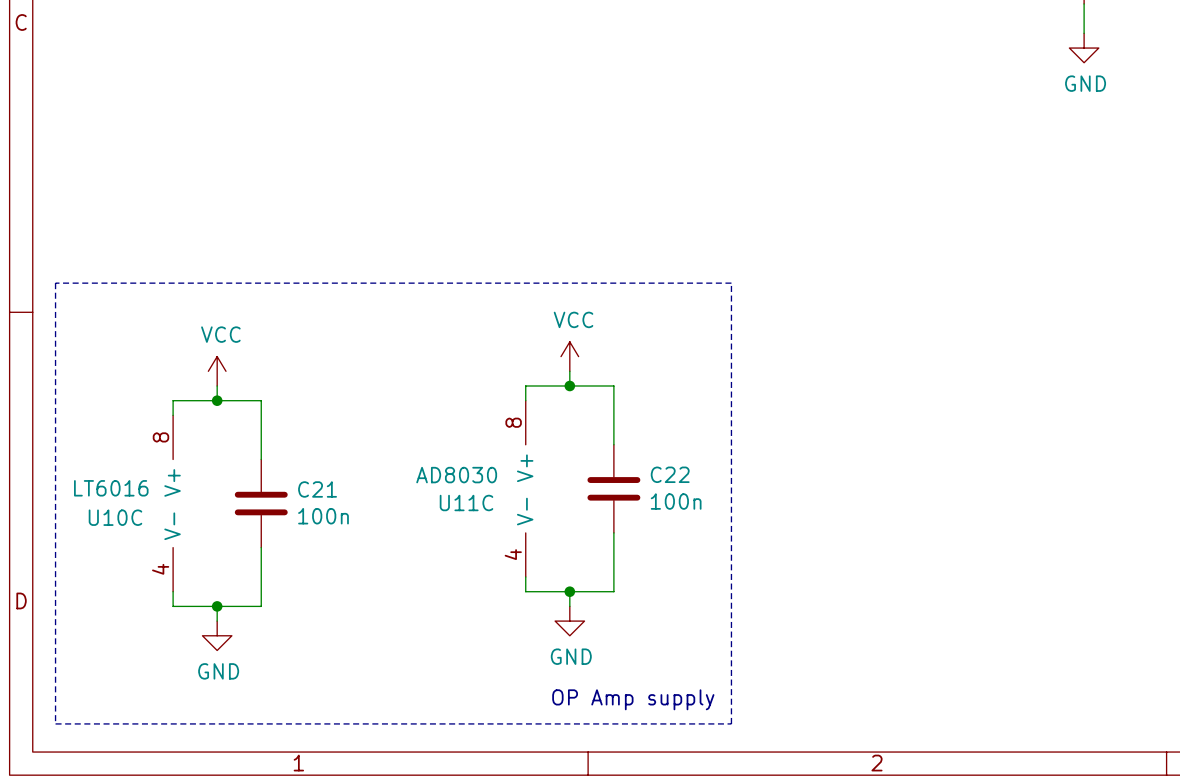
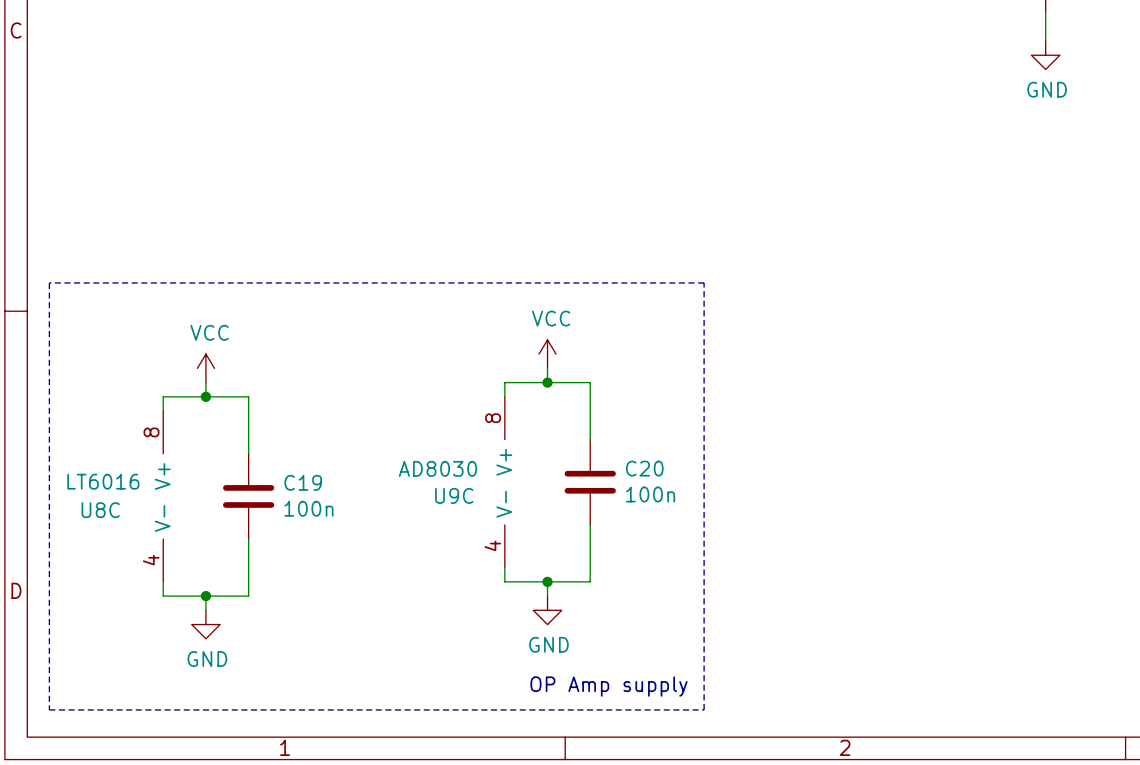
C22 name: C22 (670, 474) -> C20 (644, 468)
C21 name: C21 (317, 489) -> C19 (303, 482)
U11C name: U11C (466, 502) -> U9C (454, 495)
U10C name: U10C (115, 517) -> U8C (100, 510)

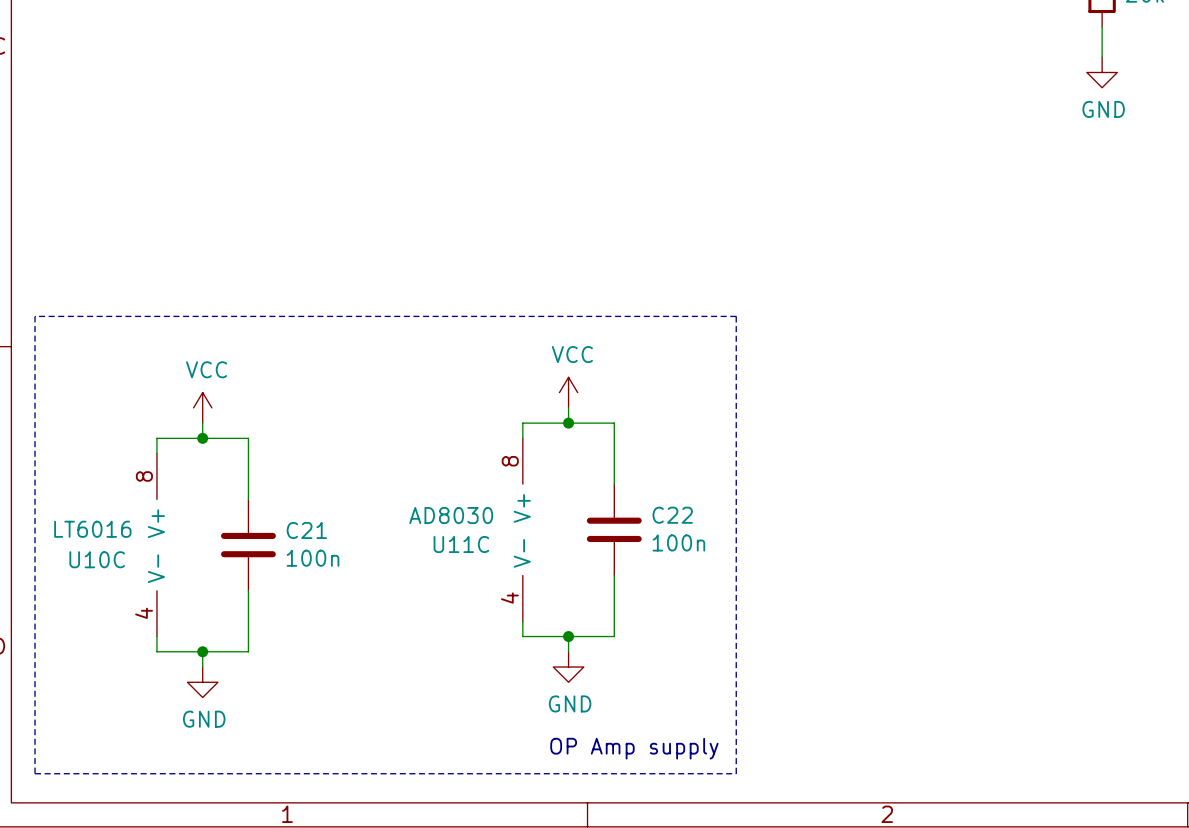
C20 name: C20 (644, 468) -> C22 (672, 515)
C19 name: C19 (303, 482) -> C21 (306, 530)
U9C name: U9C (454, 495) -> U11C (461, 544)
U8C name: U8C (100, 510) -> U10C (97, 559)

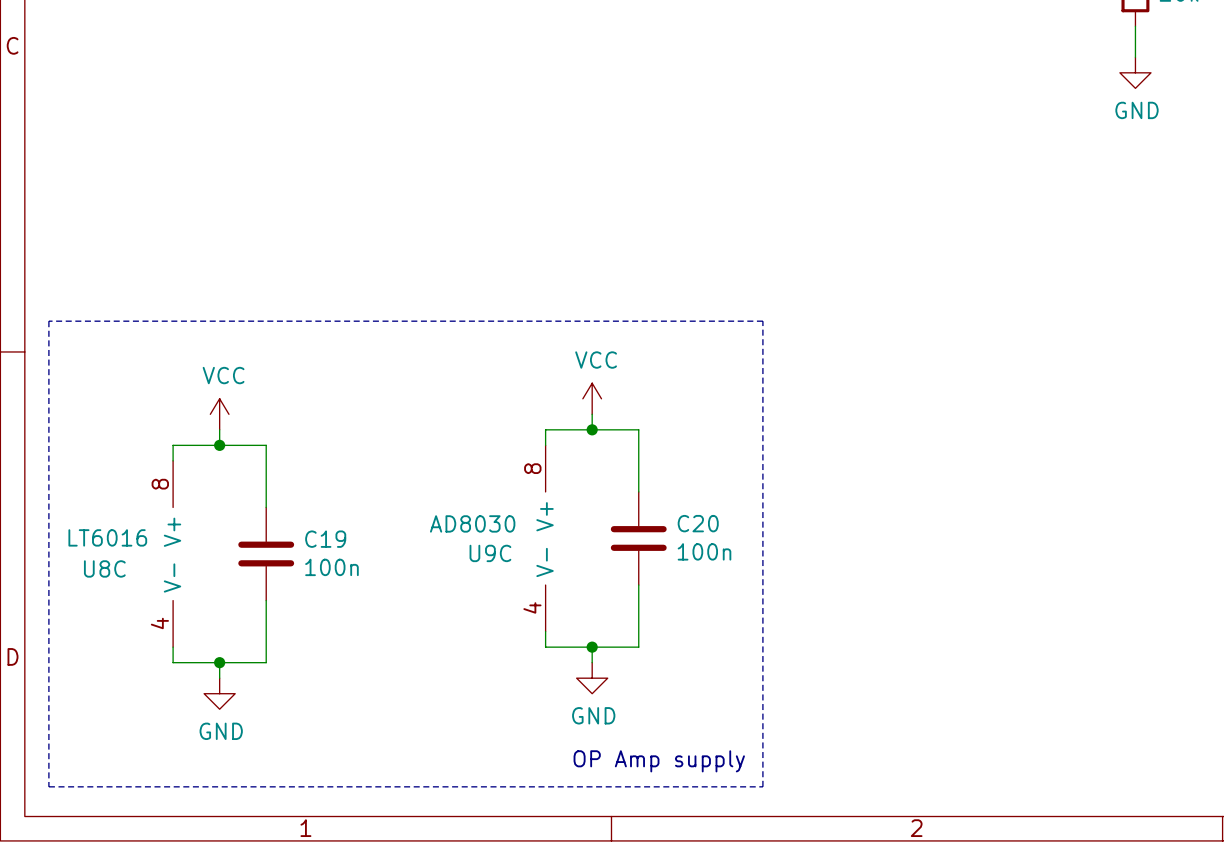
C22 name: C22 (672, 515) -> C20 (698, 523)
C21 name: C21 (306, 530) -> C19 (325, 539)
U11C name: U11C (461, 544) -> U9C (490, 553)
U10C name: U10C (97, 559) -> U8C (104, 568)

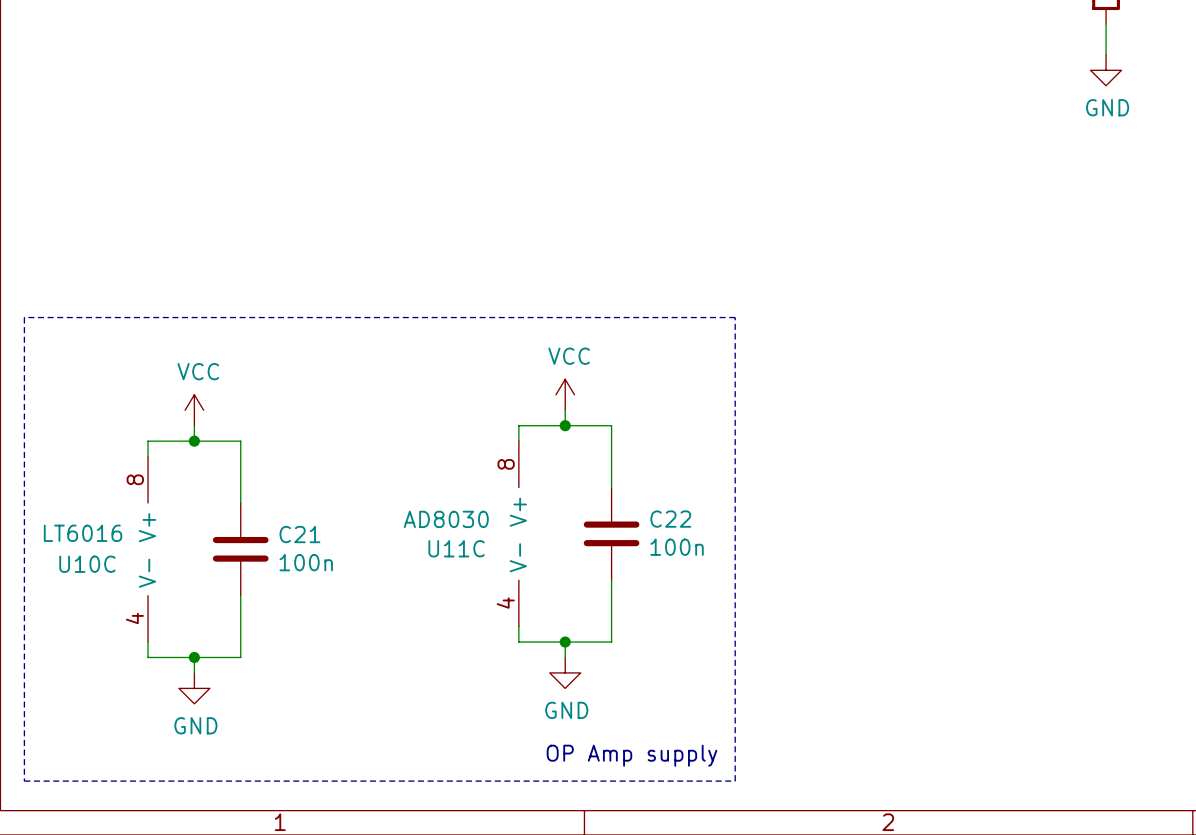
C20 name: C20 (698, 523) -> C22 (670, 519)
C19 name: C19 (325, 539) -> C21 (299, 534)
U9C name: U9C (490, 553) -> U11C (456, 548)
U8C name: U8C (104, 568) -> U10C (87, 564)

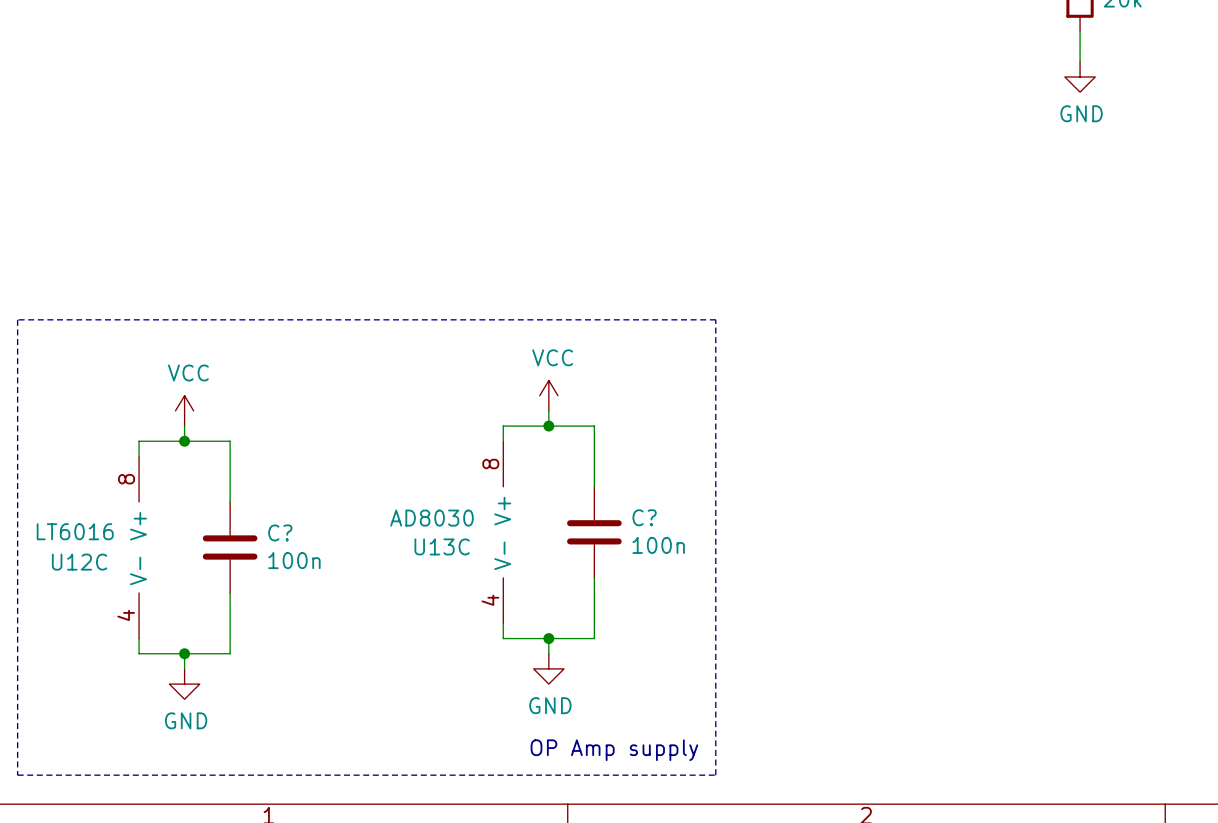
C22 name: C22 (670, 519) -> C? (644, 517)
C21 name: C21 (299, 534) -> C? (280, 532)
U11C name: U11C (456, 548) -> U13C (442, 546)
U10C name: U10C (87, 564) -> U12C (79, 562)

